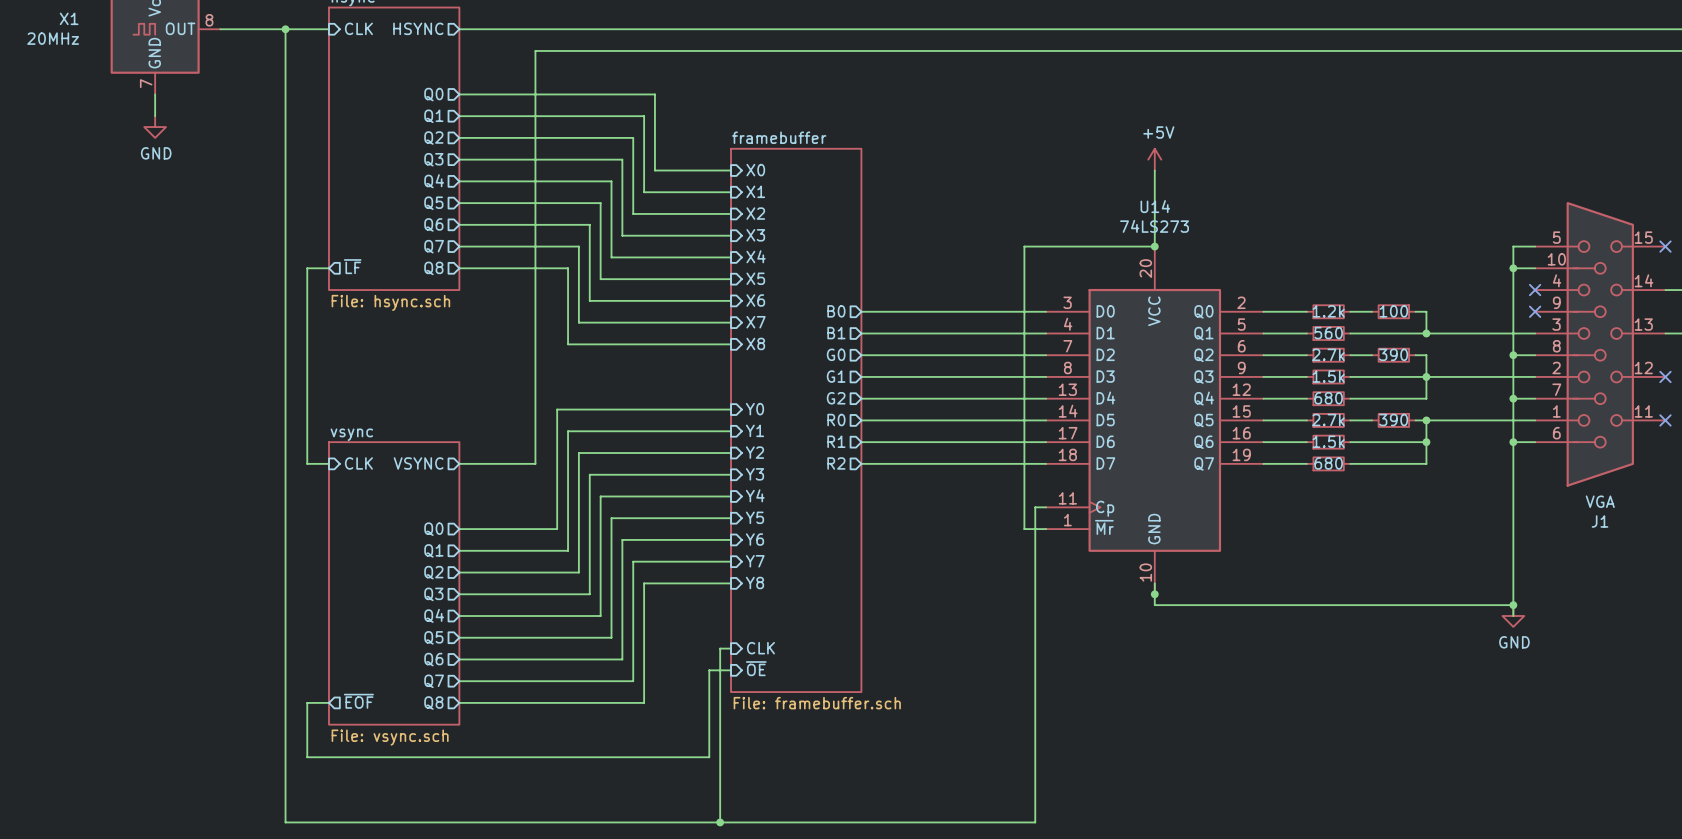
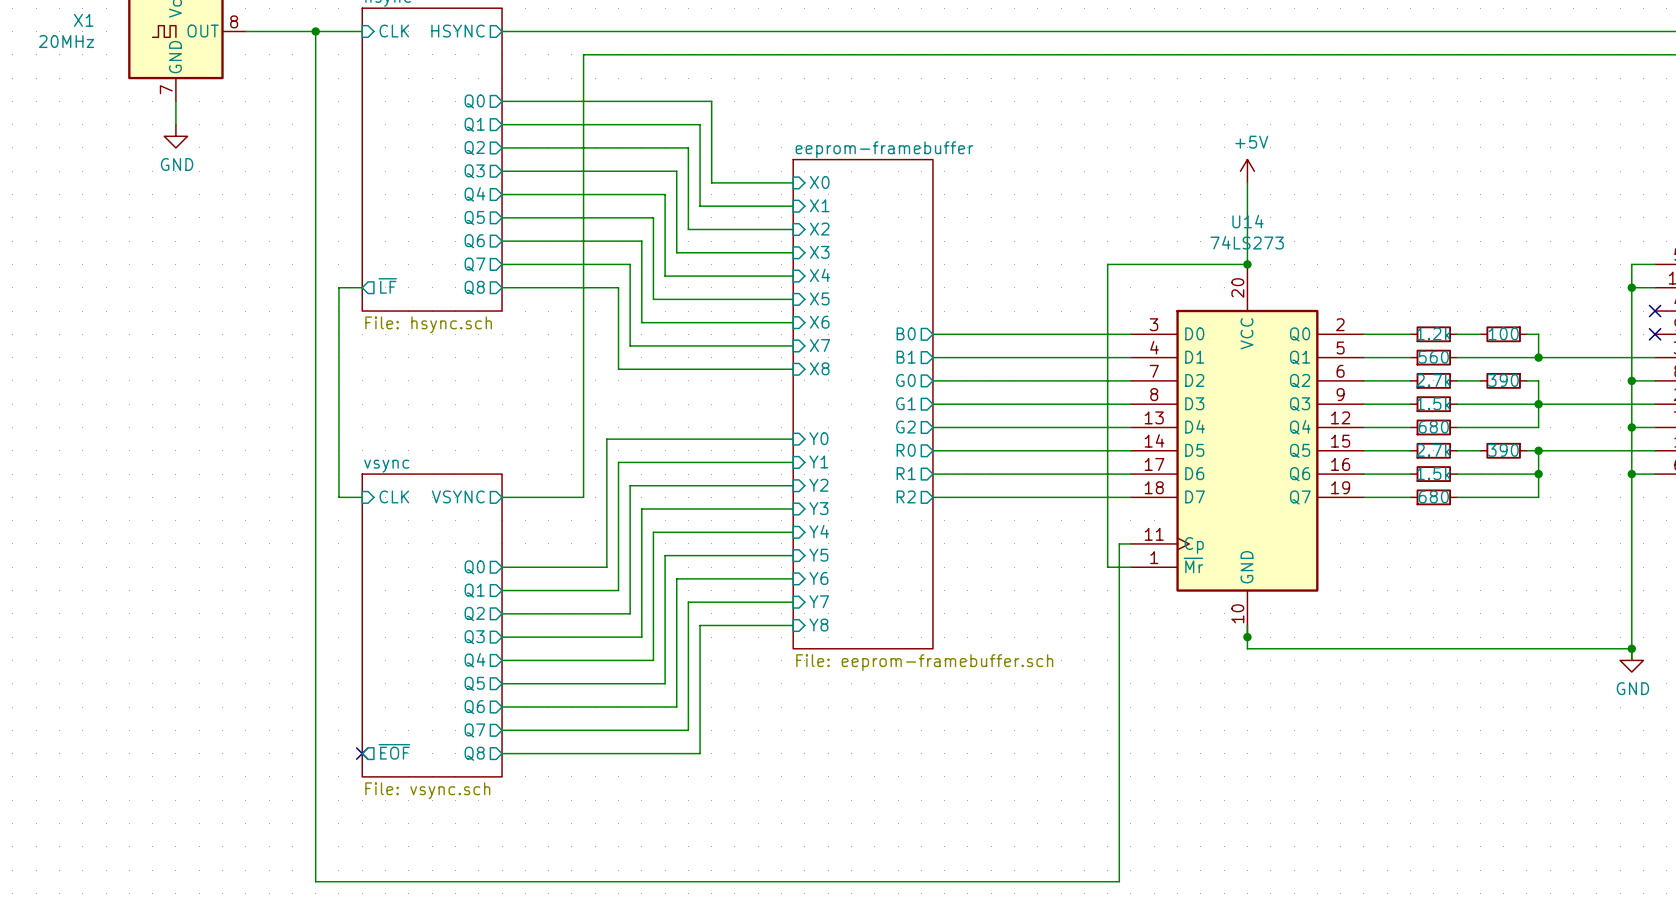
sheet eeprom-framebuffer: none -> File: eeprom-framebuffer.sch (863, 404)
sheet framebuffer: File: framebuffer.sch (796, 420) -> none
wire: (731, 648) (720, 648) (720, 822) -> none
sheet pin: CLK (760, 648) -> none
sheet pin: ~{OE} (756, 668) -> none
wire: (731, 670) (709, 670) (709, 757) (307, 757) (307, 702) (328, 702) -> none
no-connect mark: none -> (362, 753)
junction: (720, 822) -> none

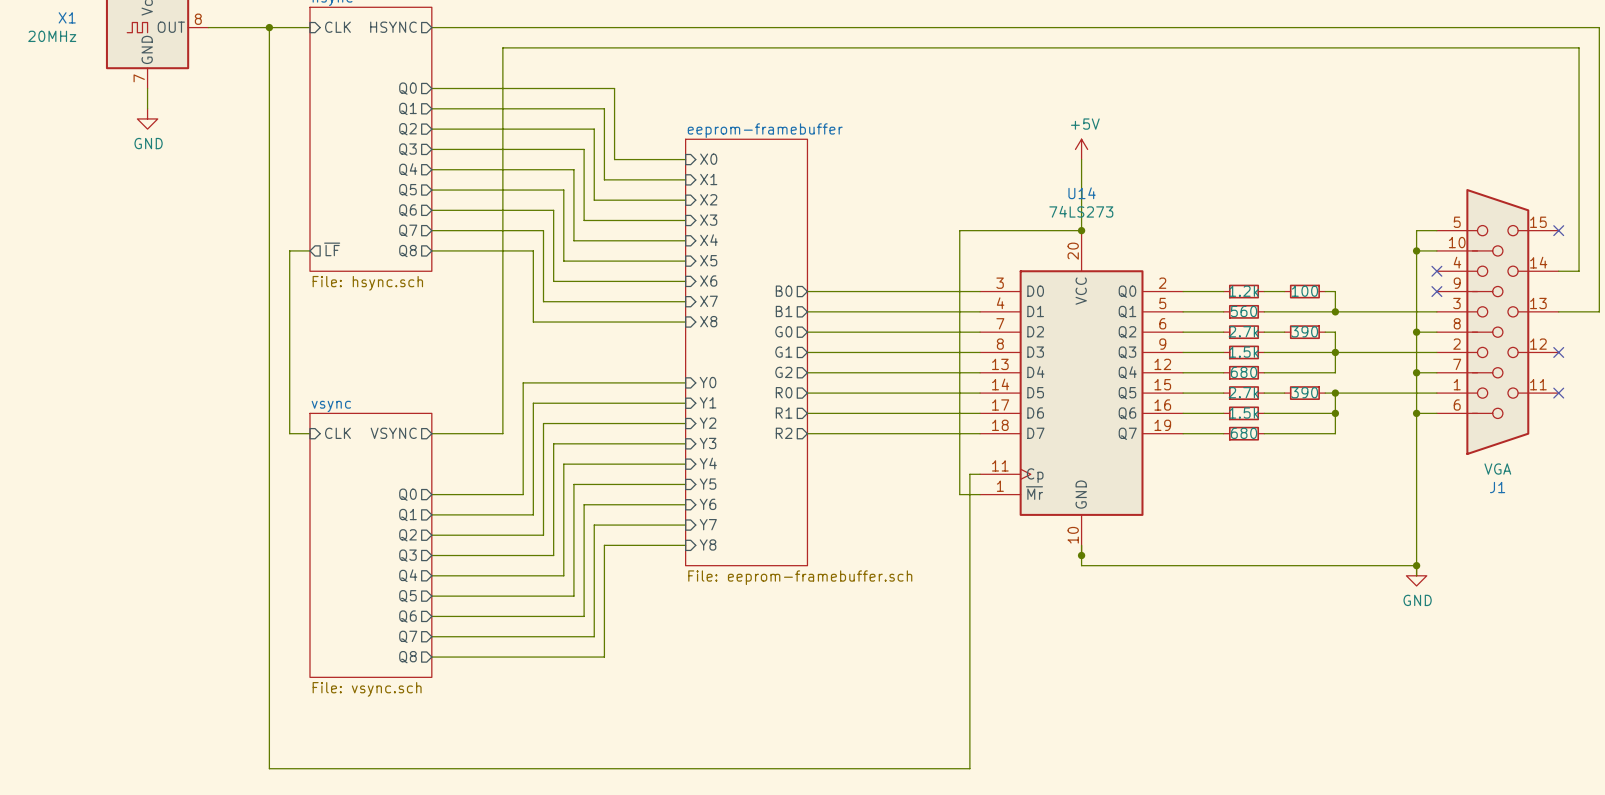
sheet pin: ~{EOF} (394, 751) -> none
no-connect mark: (362, 753) -> none

